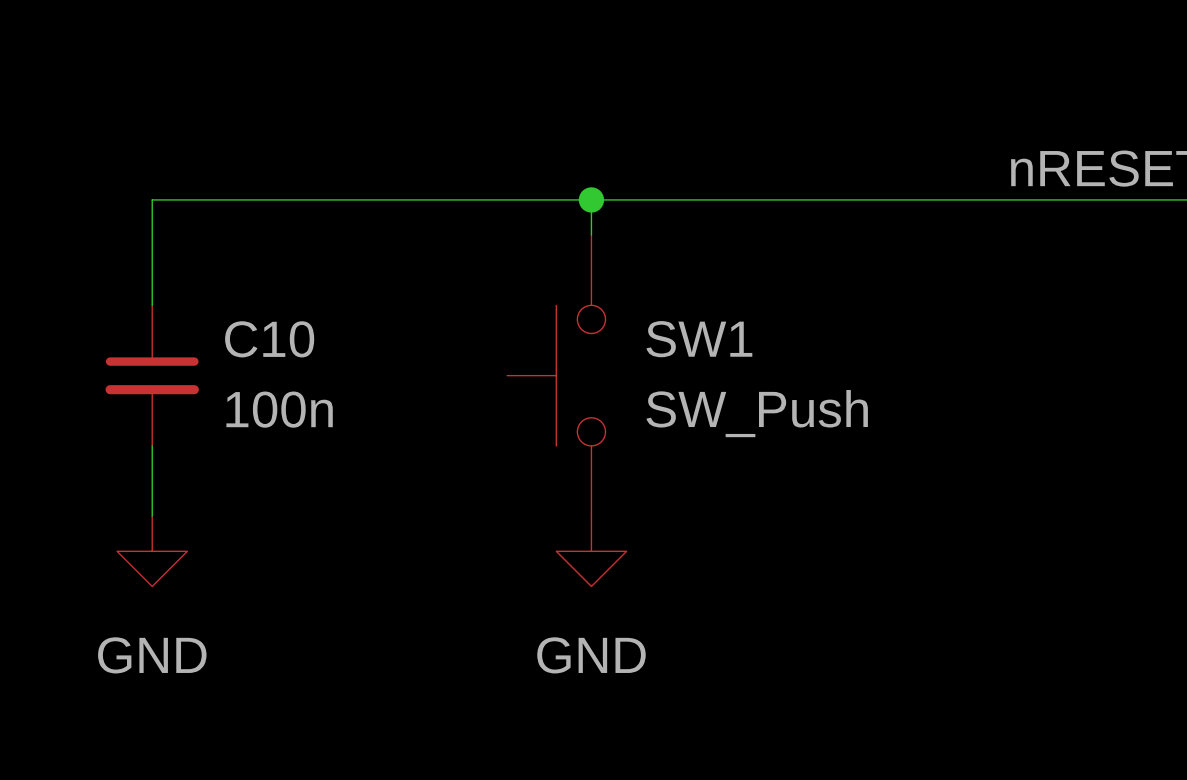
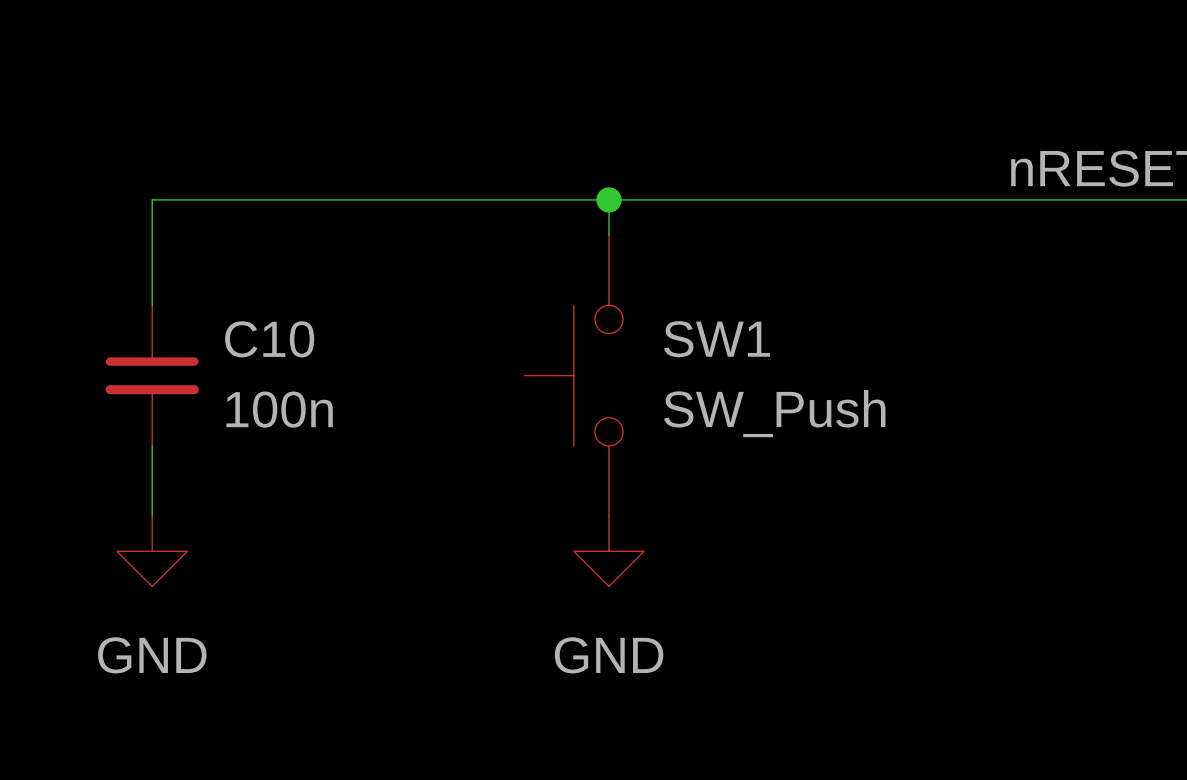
wire: (591, 199) (591, 235) -> (609, 199) (609, 235)
junction position: (591, 199) -> (609, 199)
SW1 position: (556, 375) -> (573, 375)
power symbol position: GND (591, 551) -> GND (609, 551)

